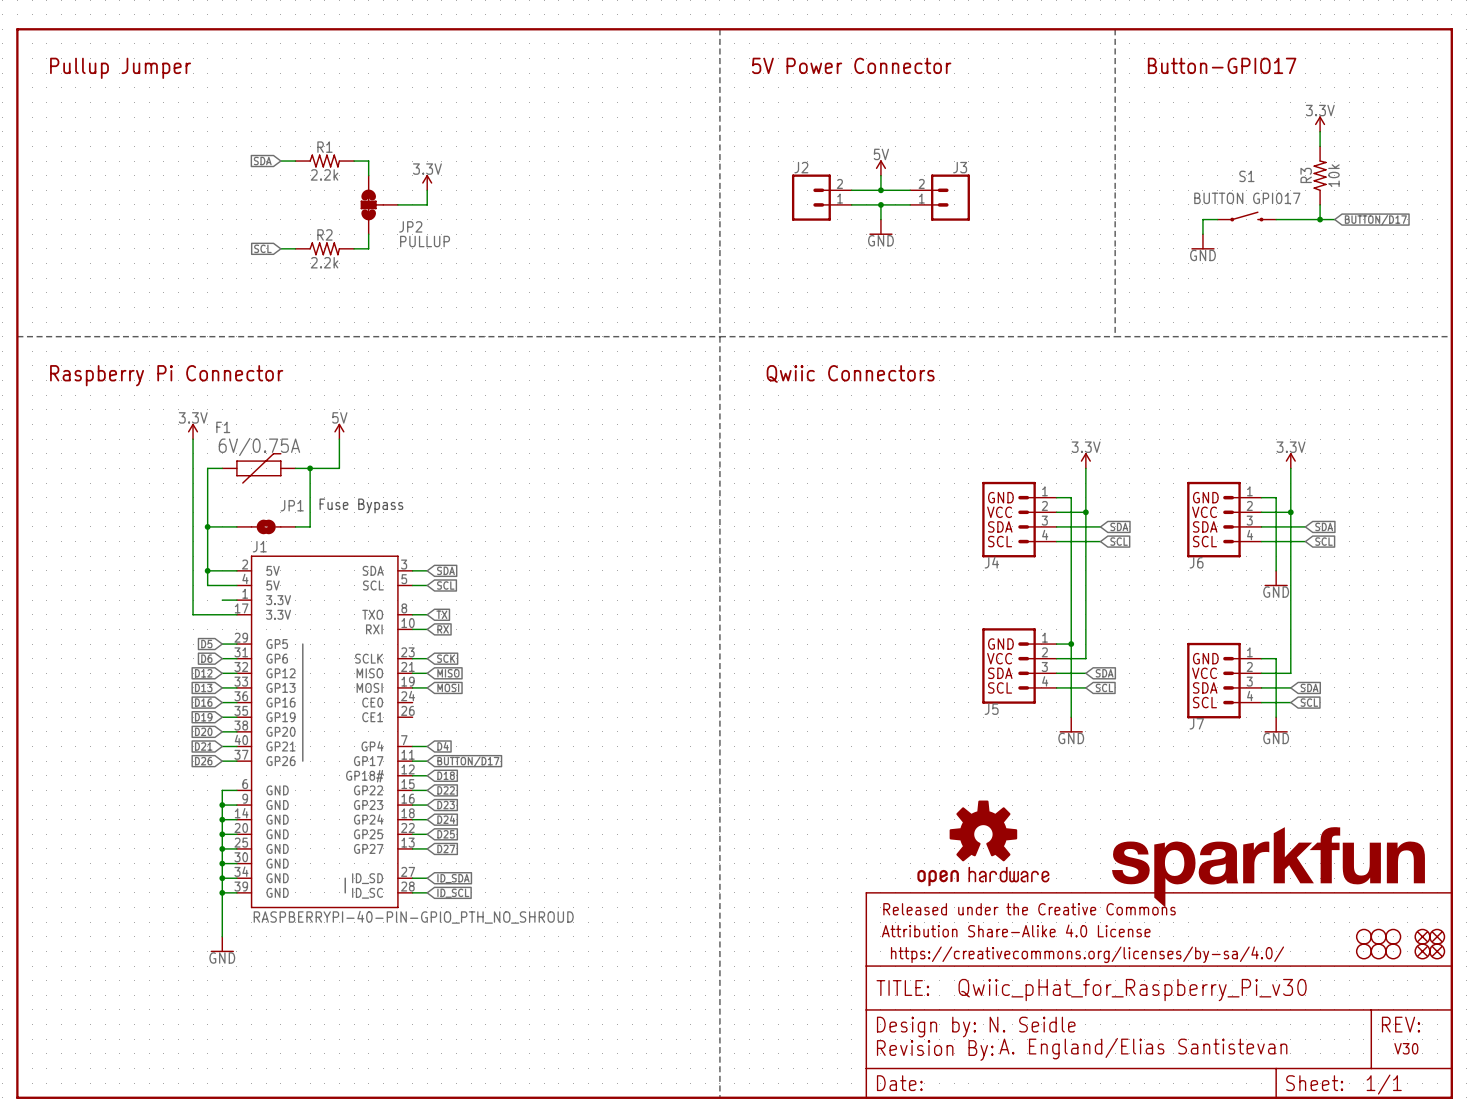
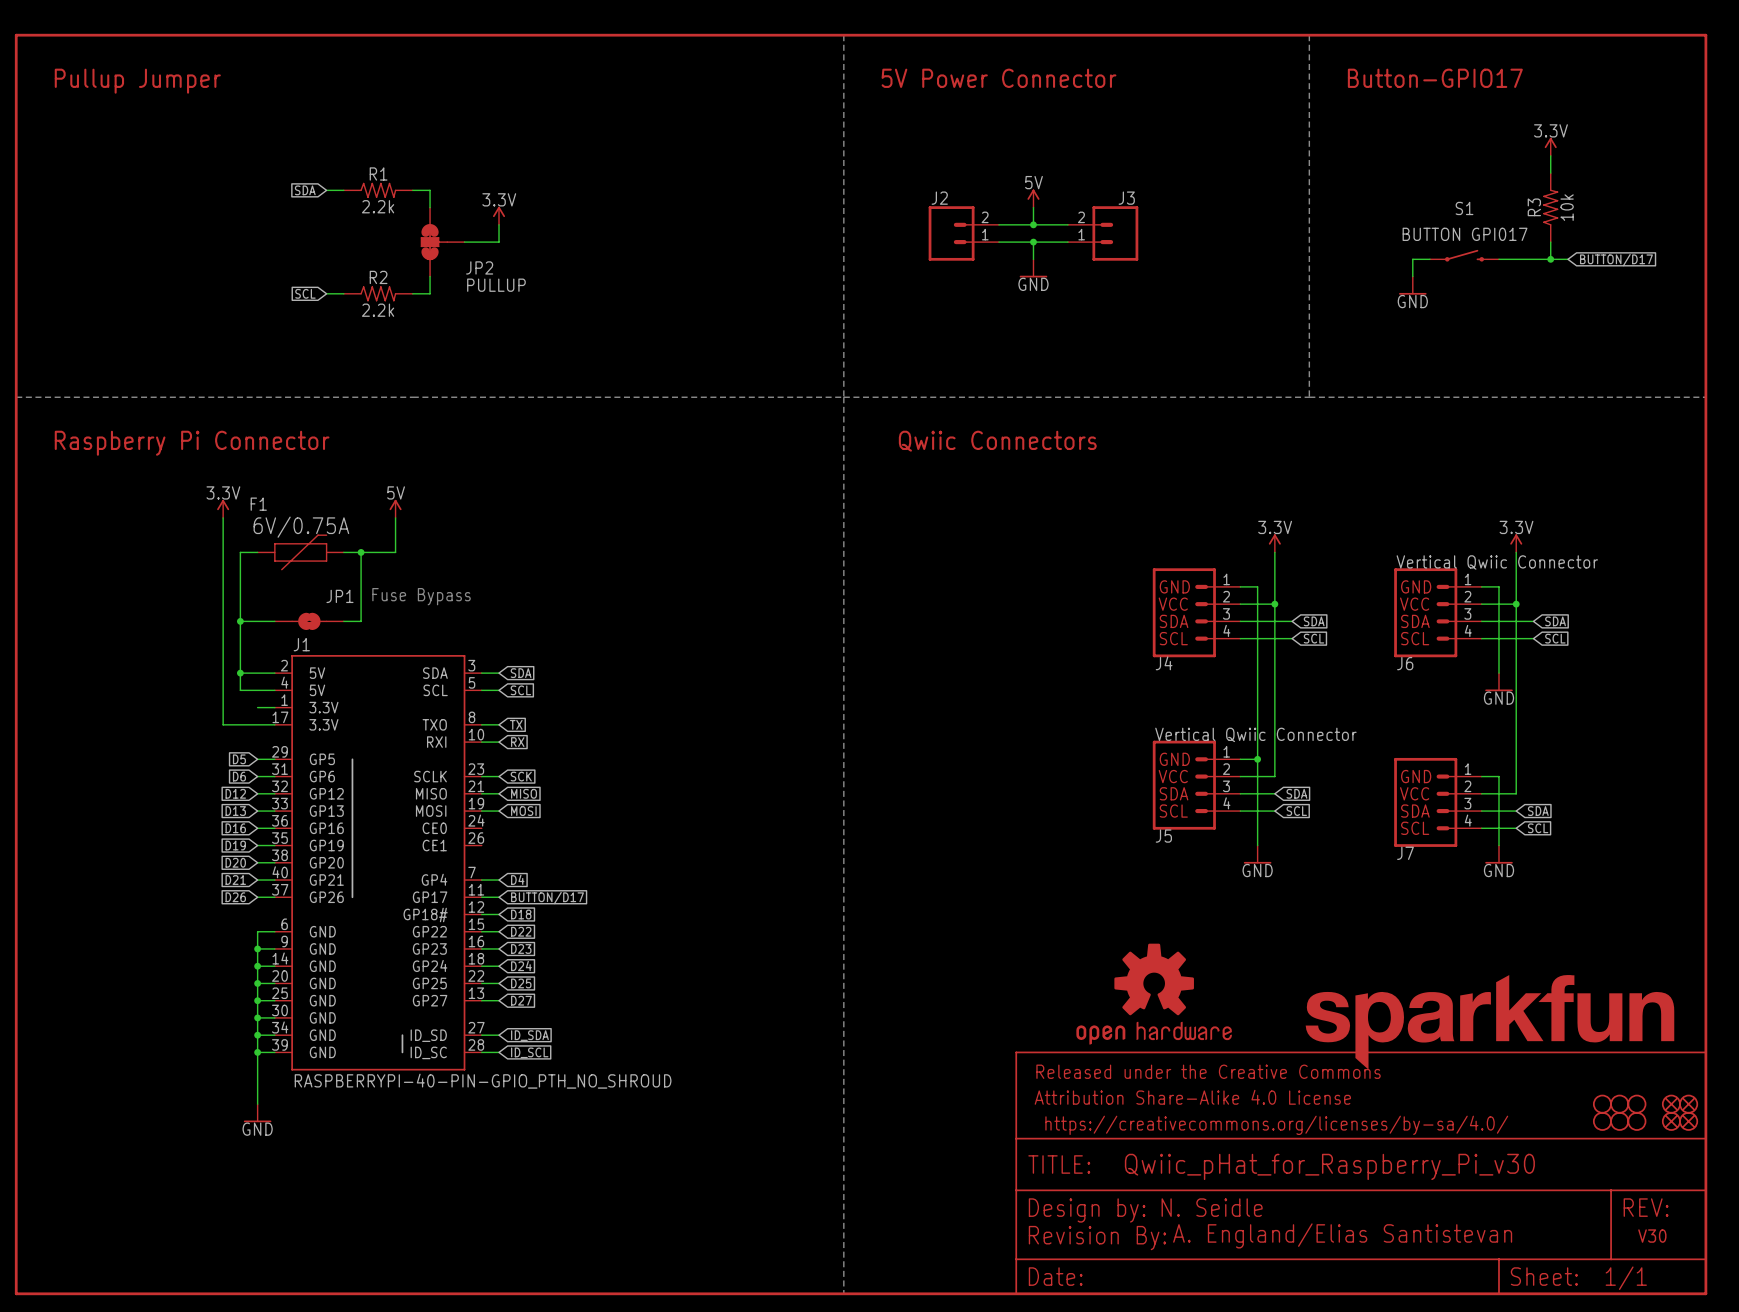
J6 value: none -> Vertical Qwiic Connector (1497, 562)
J5 value: none -> Vertical Qwiic Connector (1255, 734)

